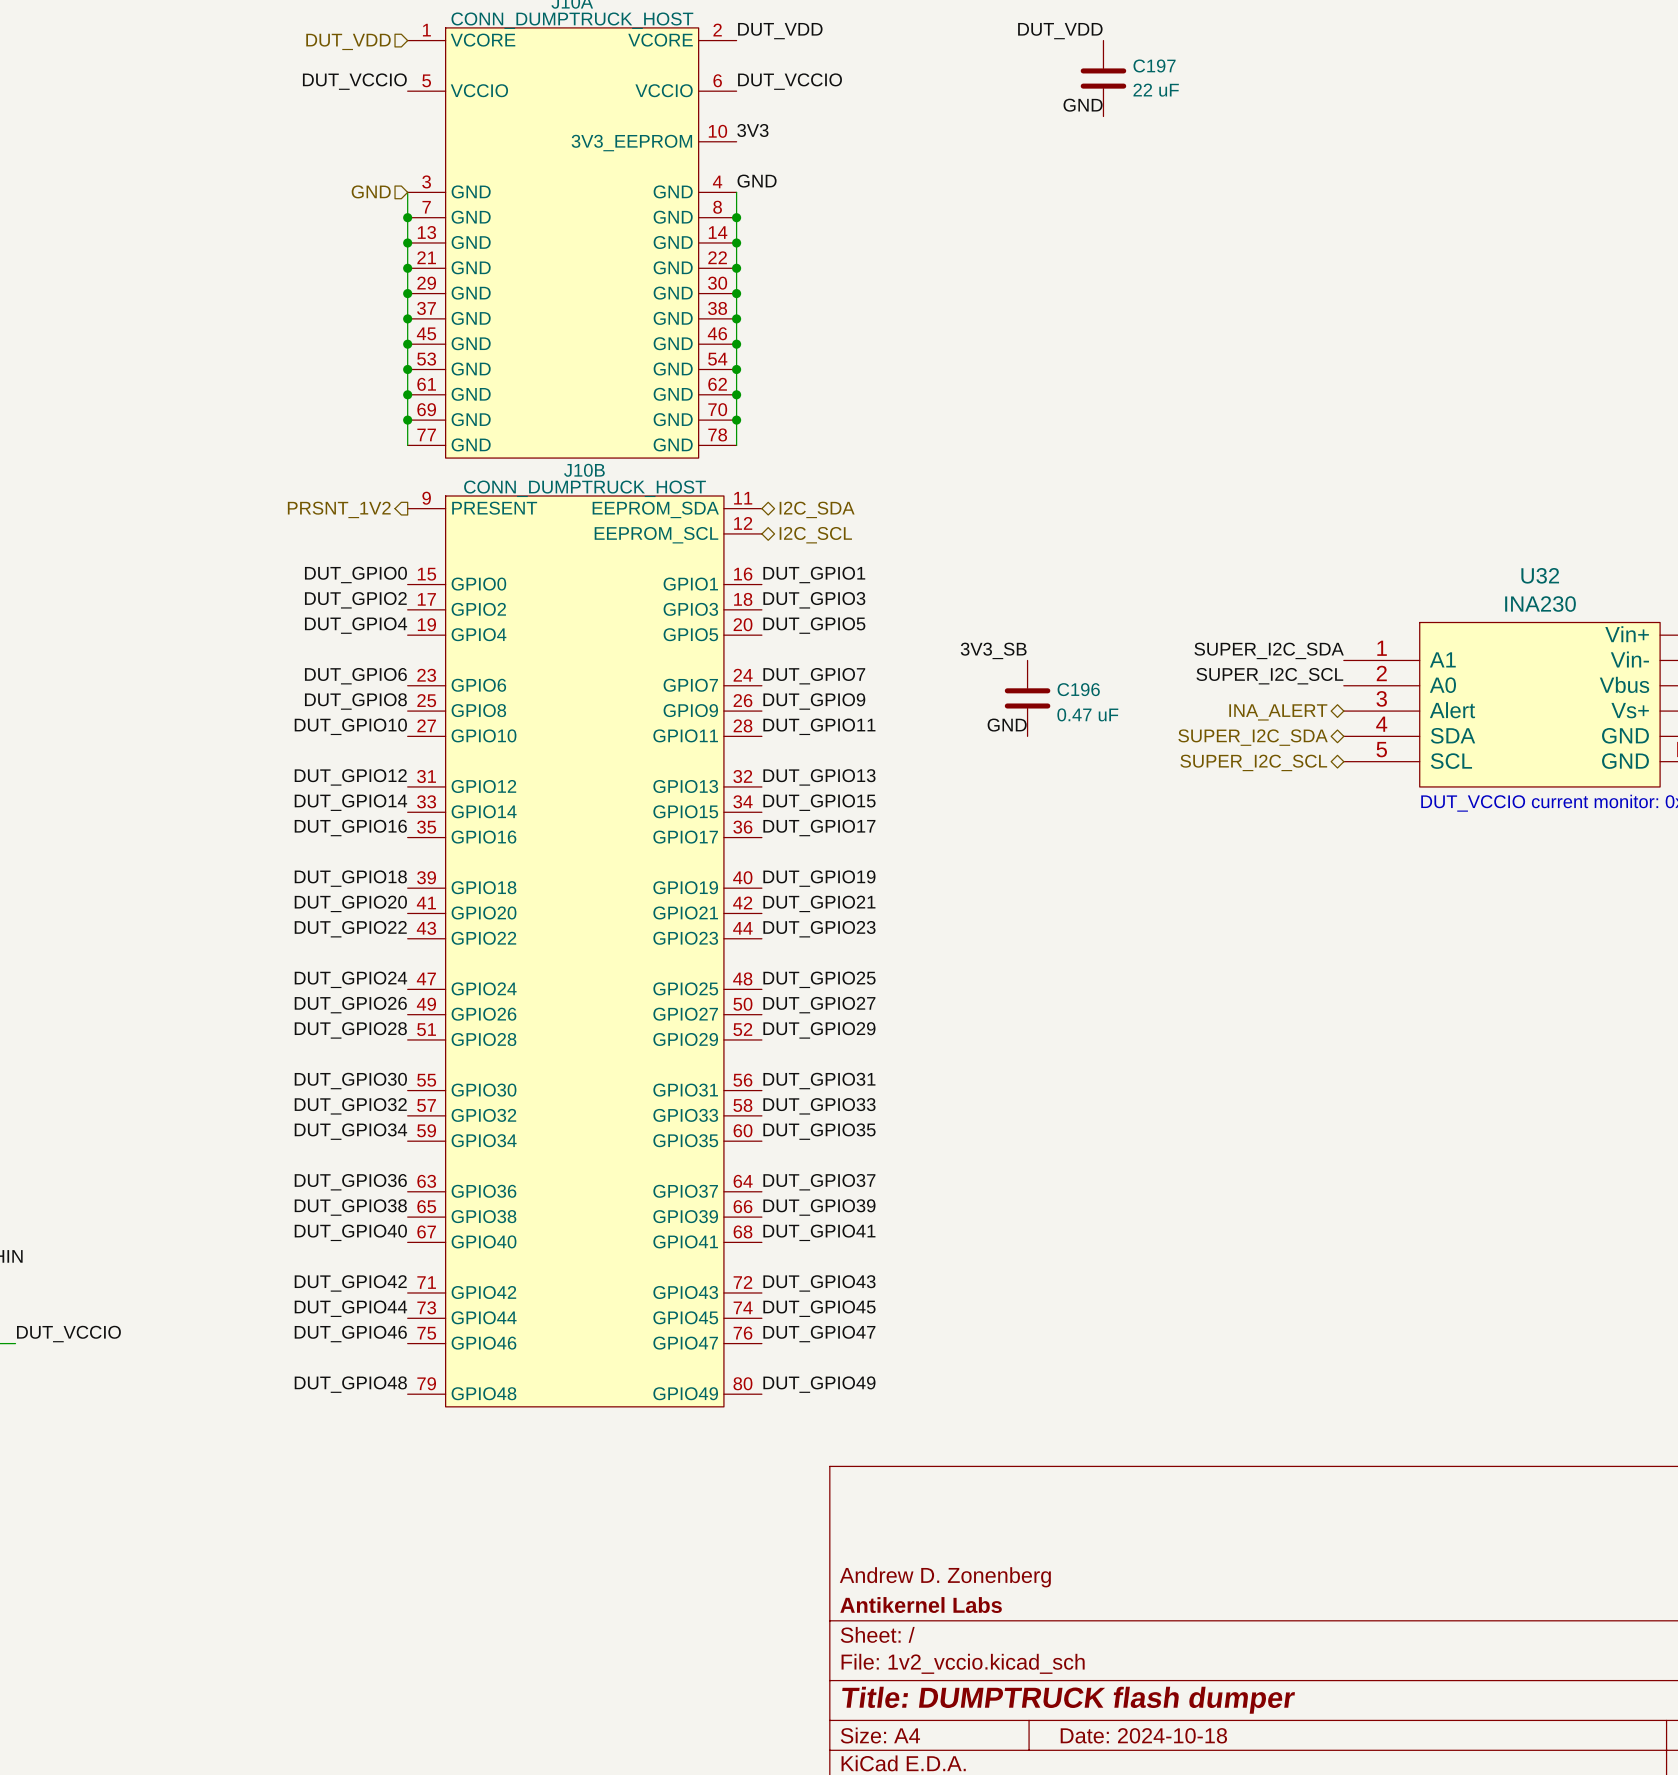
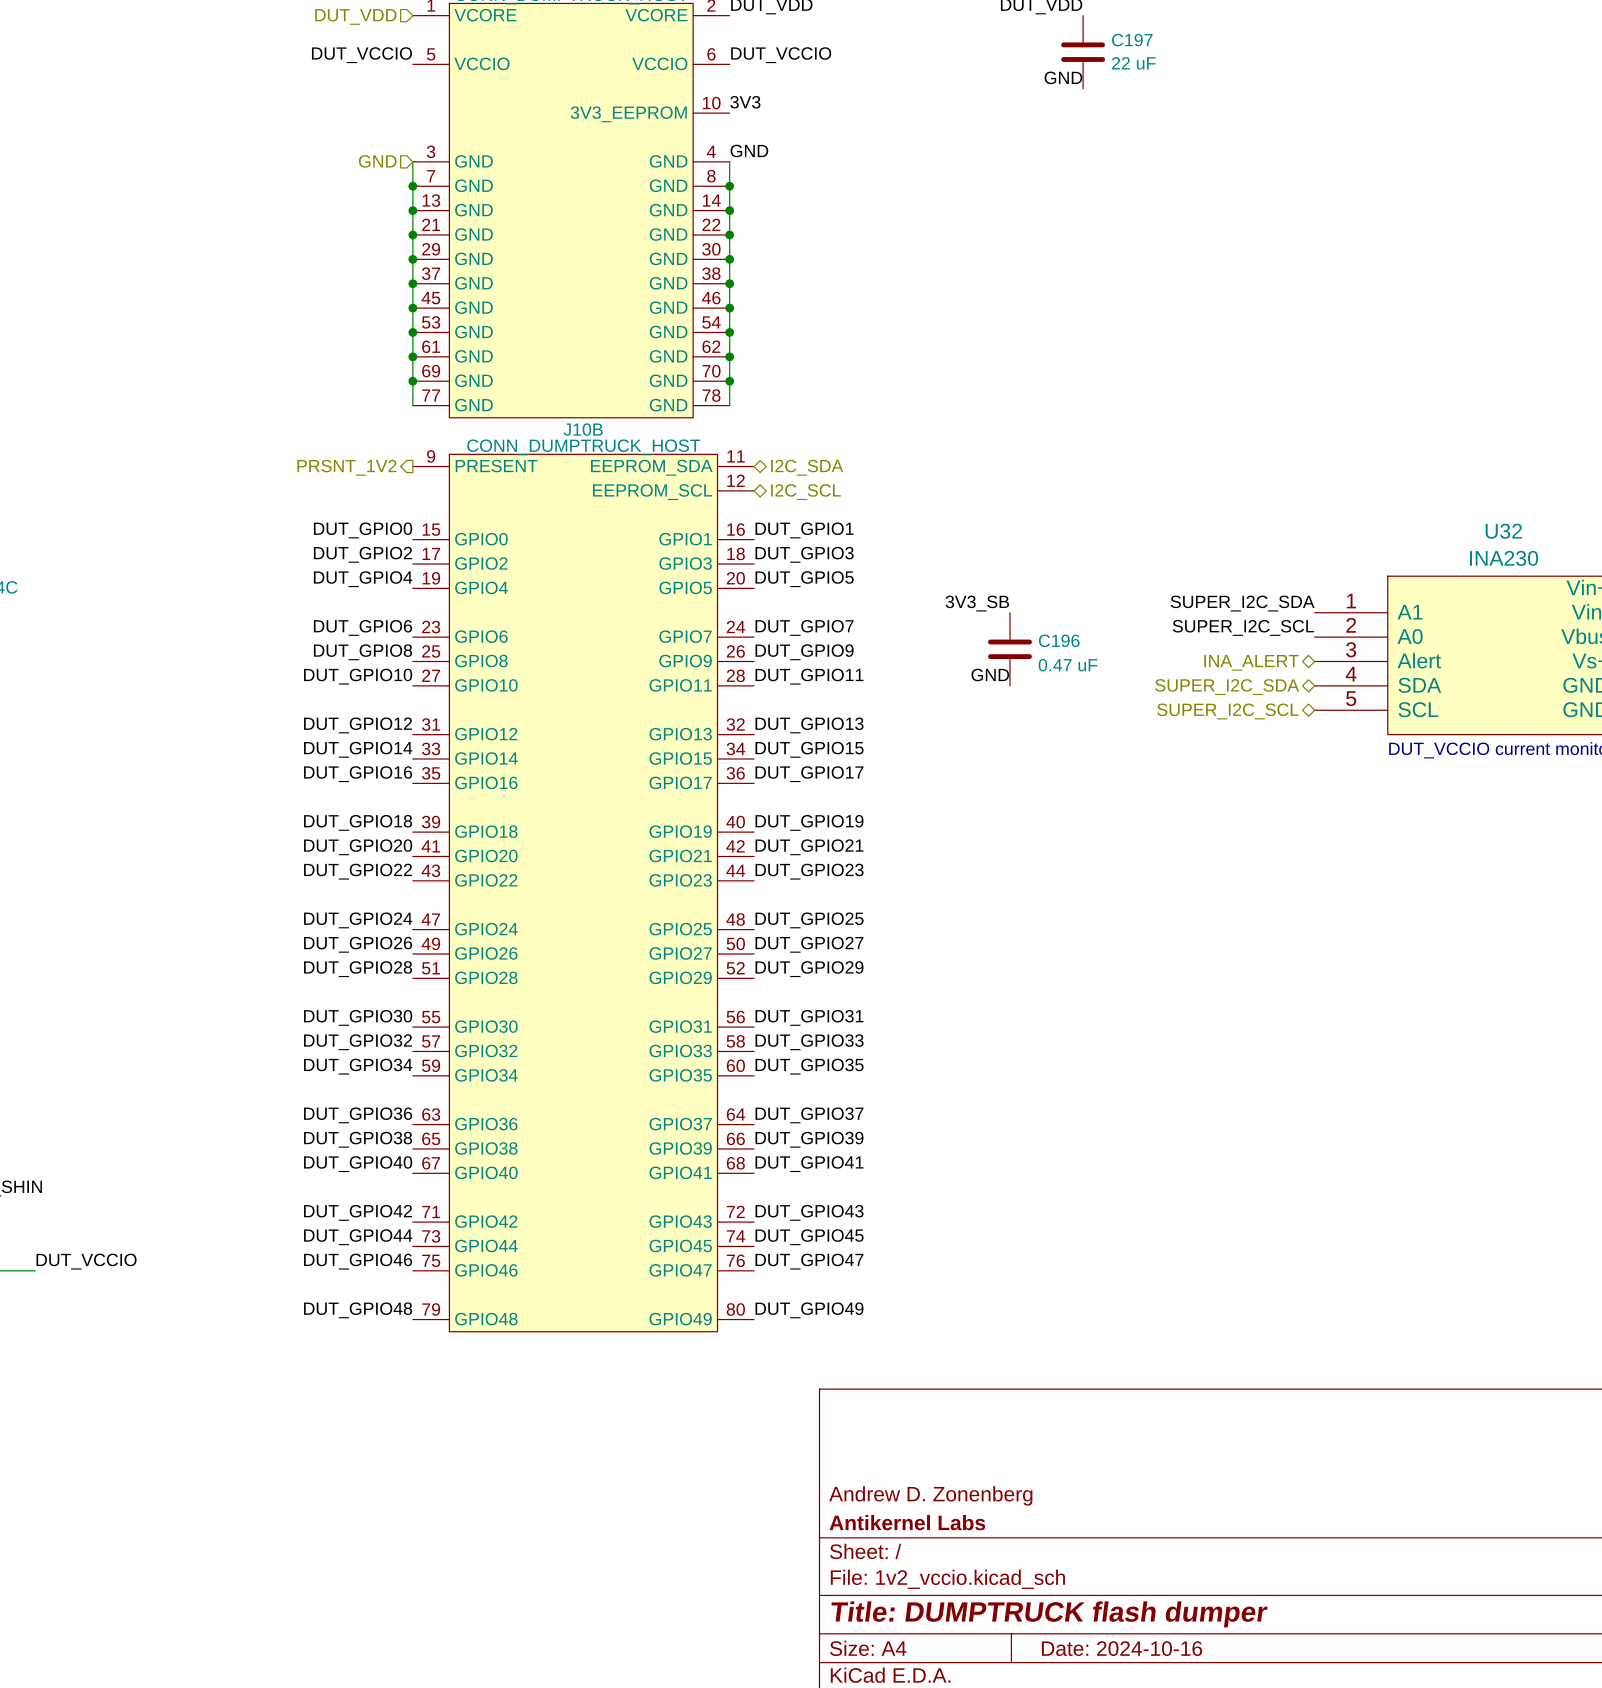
title block: Date: 2024-10-18 (1143, 1735) -> Date: 2024-10-16 (1122, 1648)

